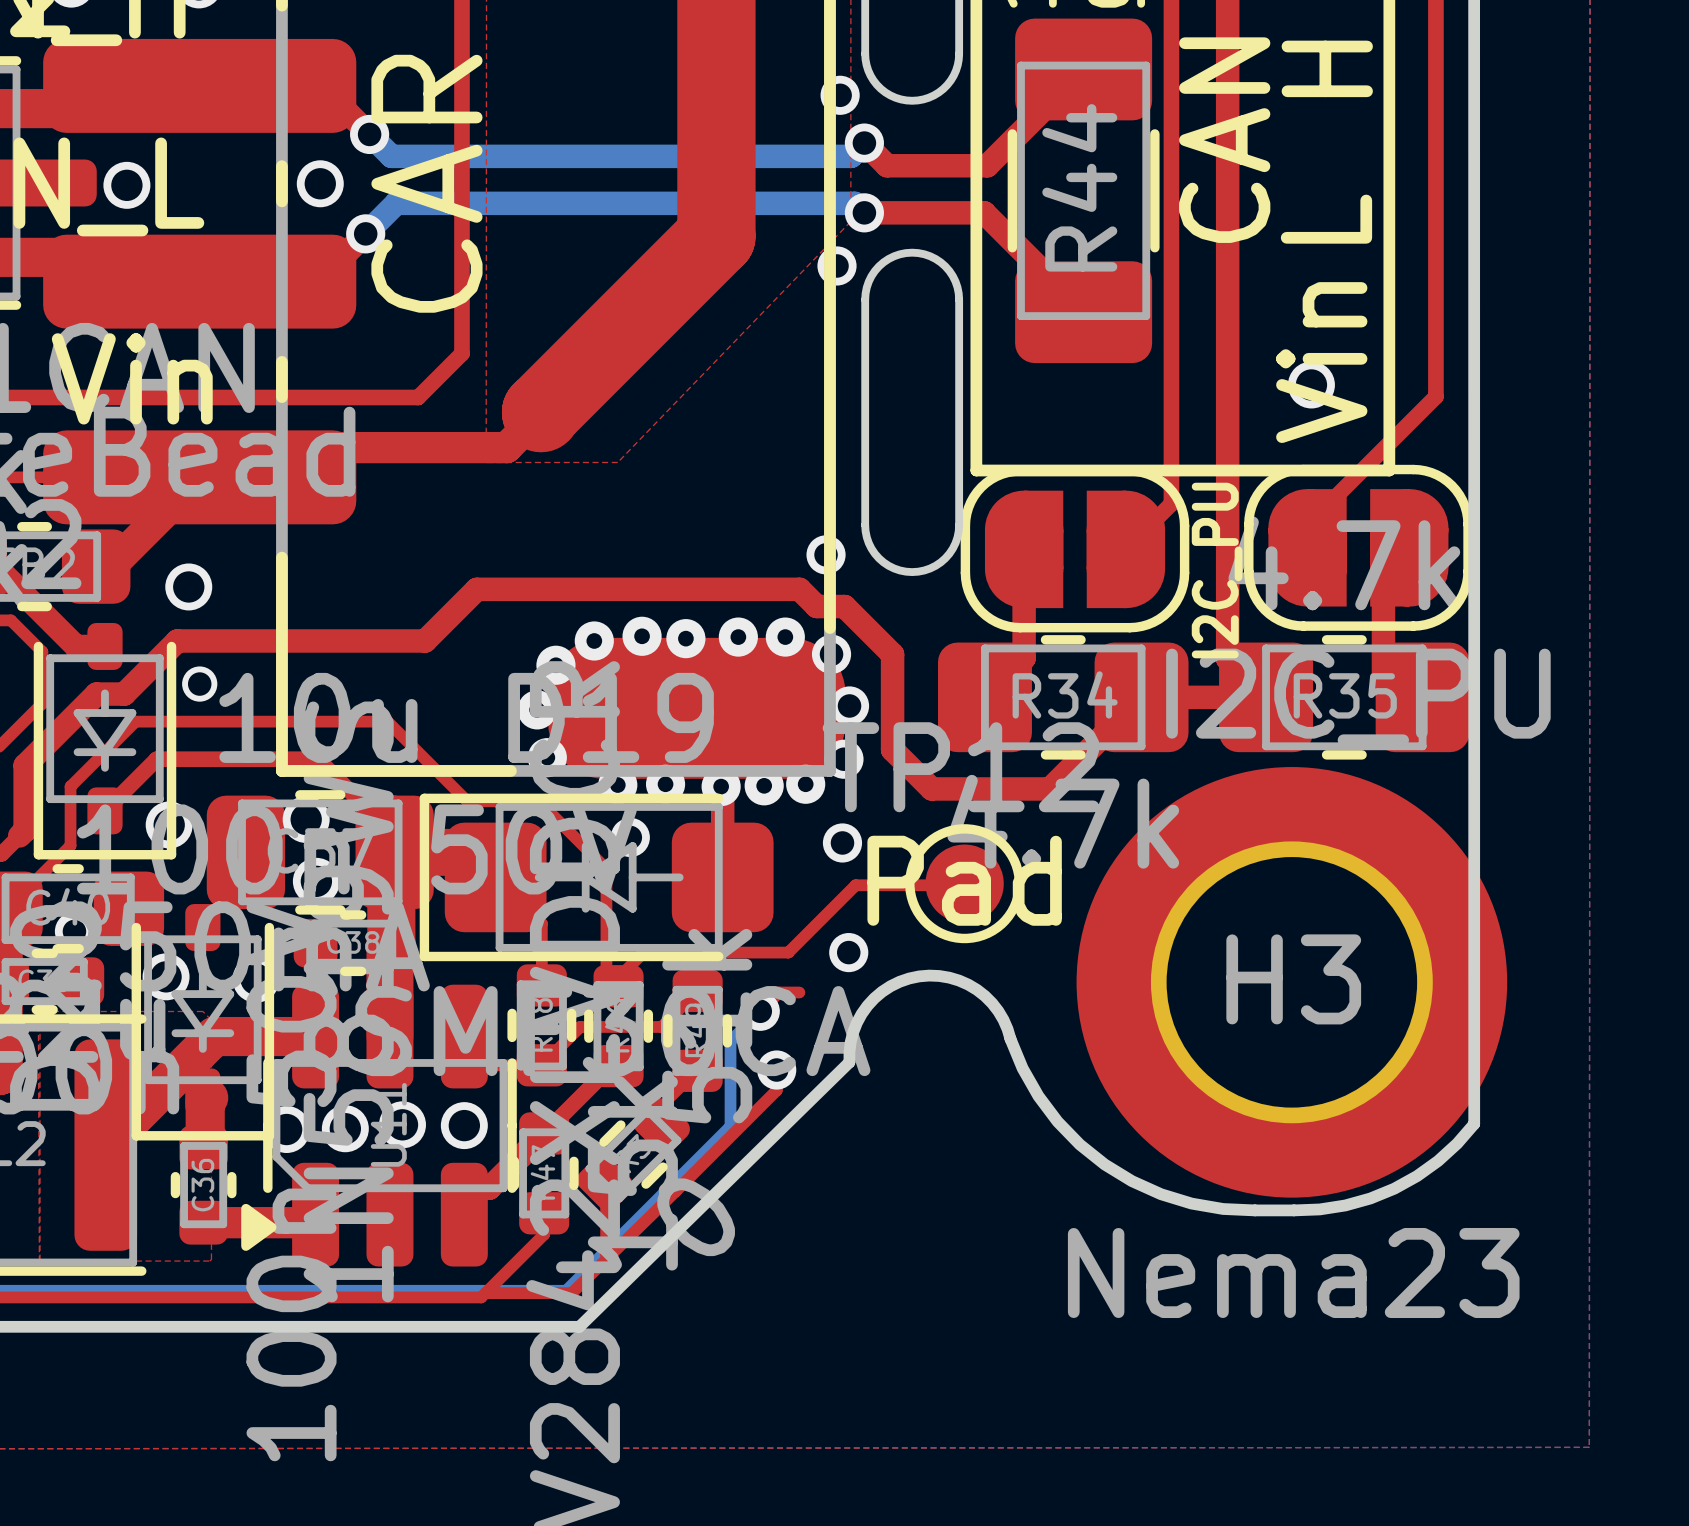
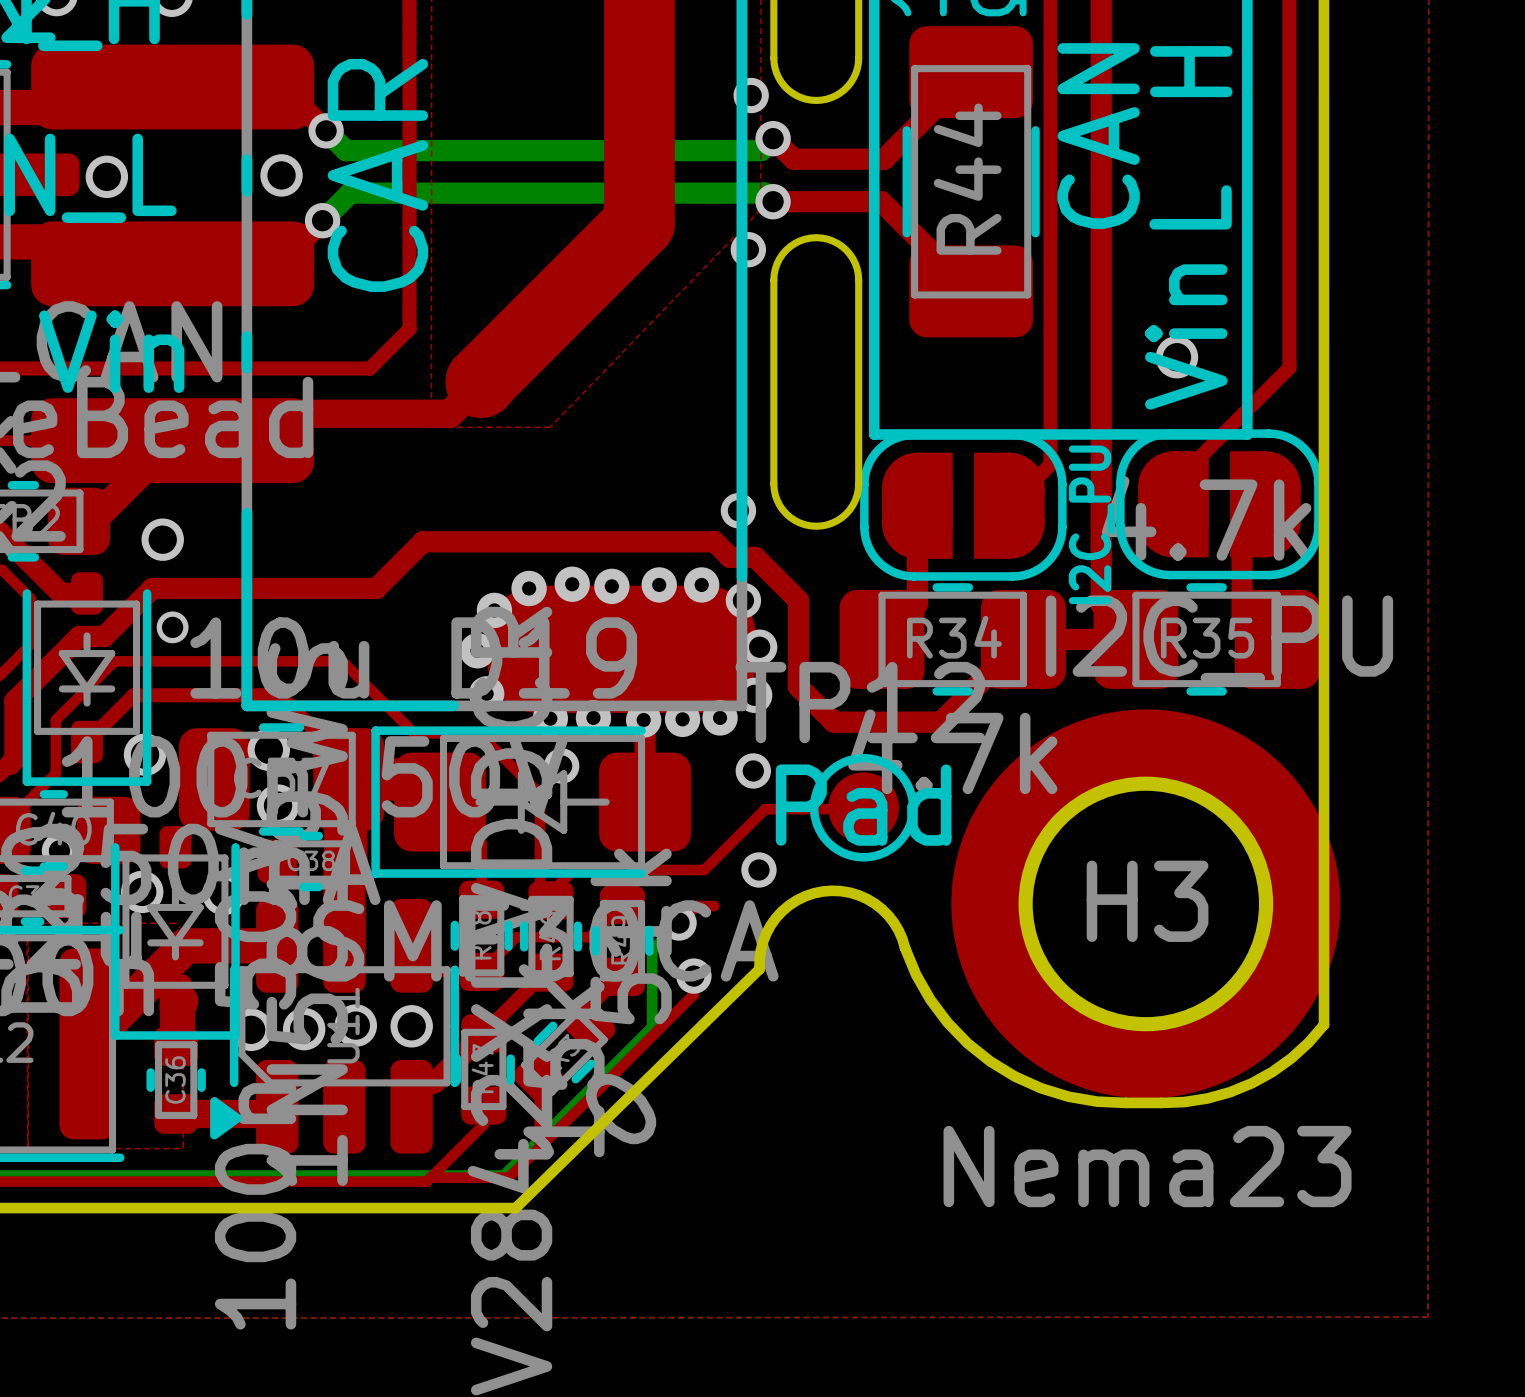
H3 position: (1291, 982) -> (1145, 903)

